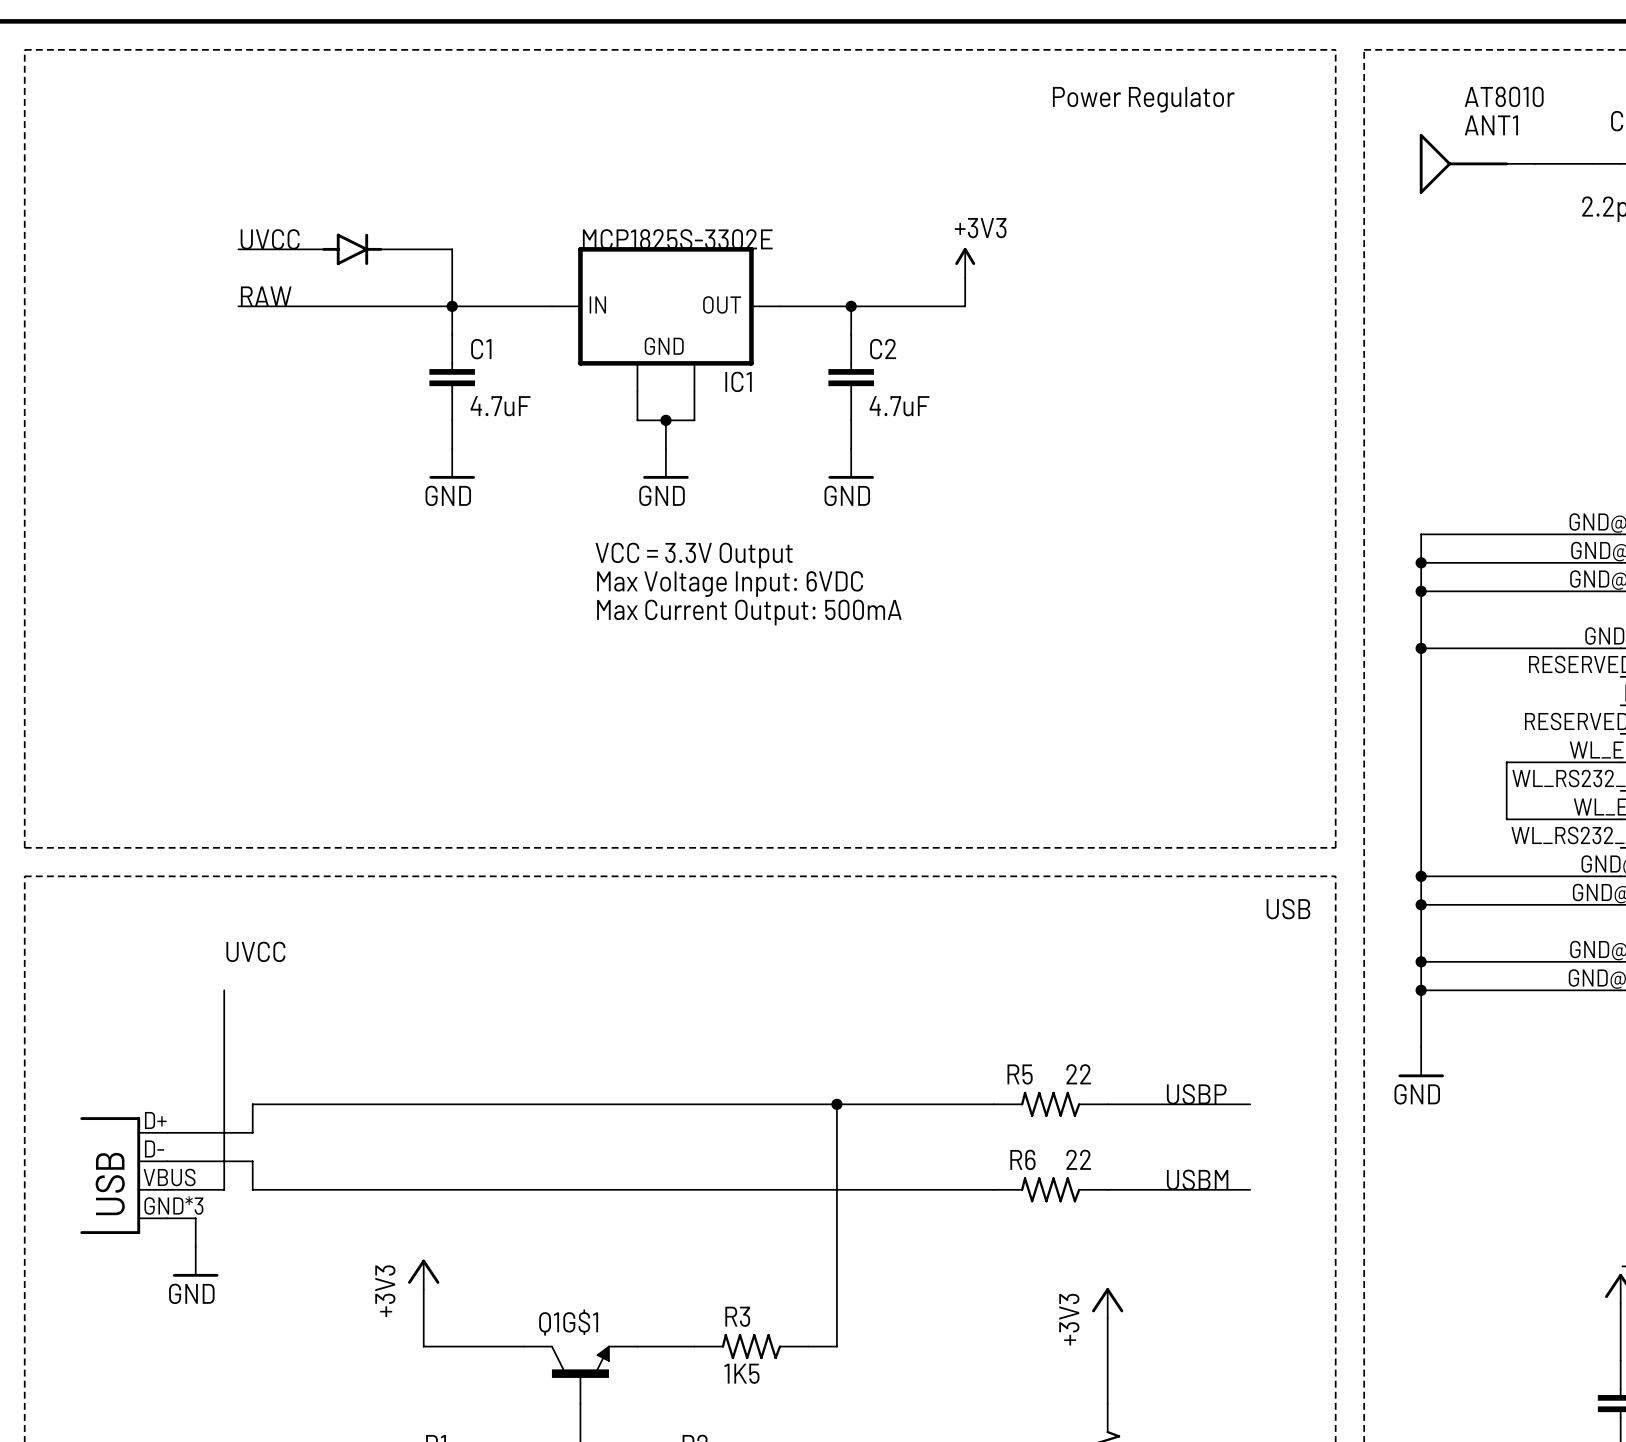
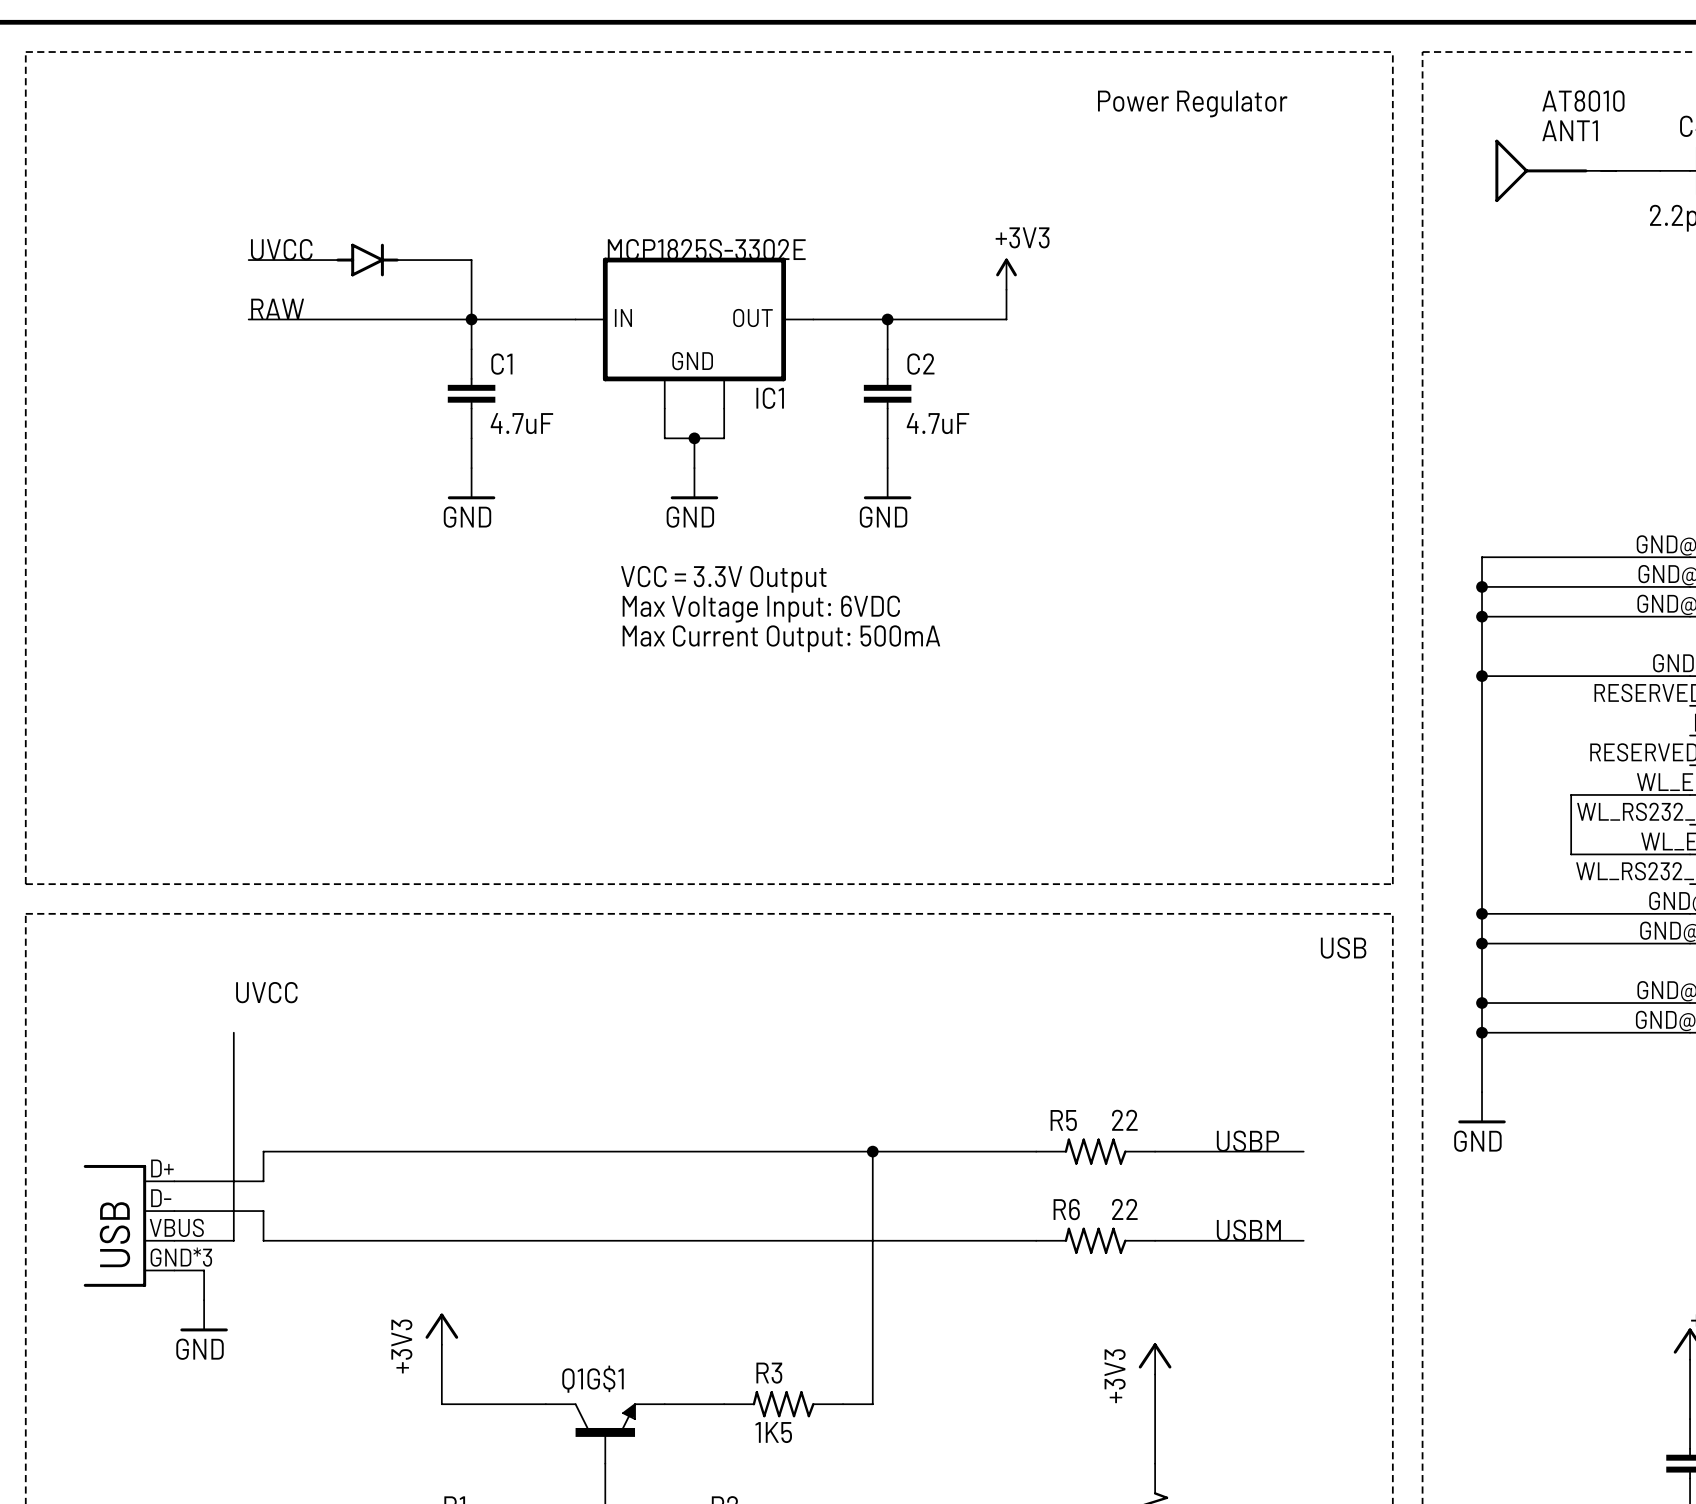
ANT1 position: (1477, 163) -> (1555, 170)

